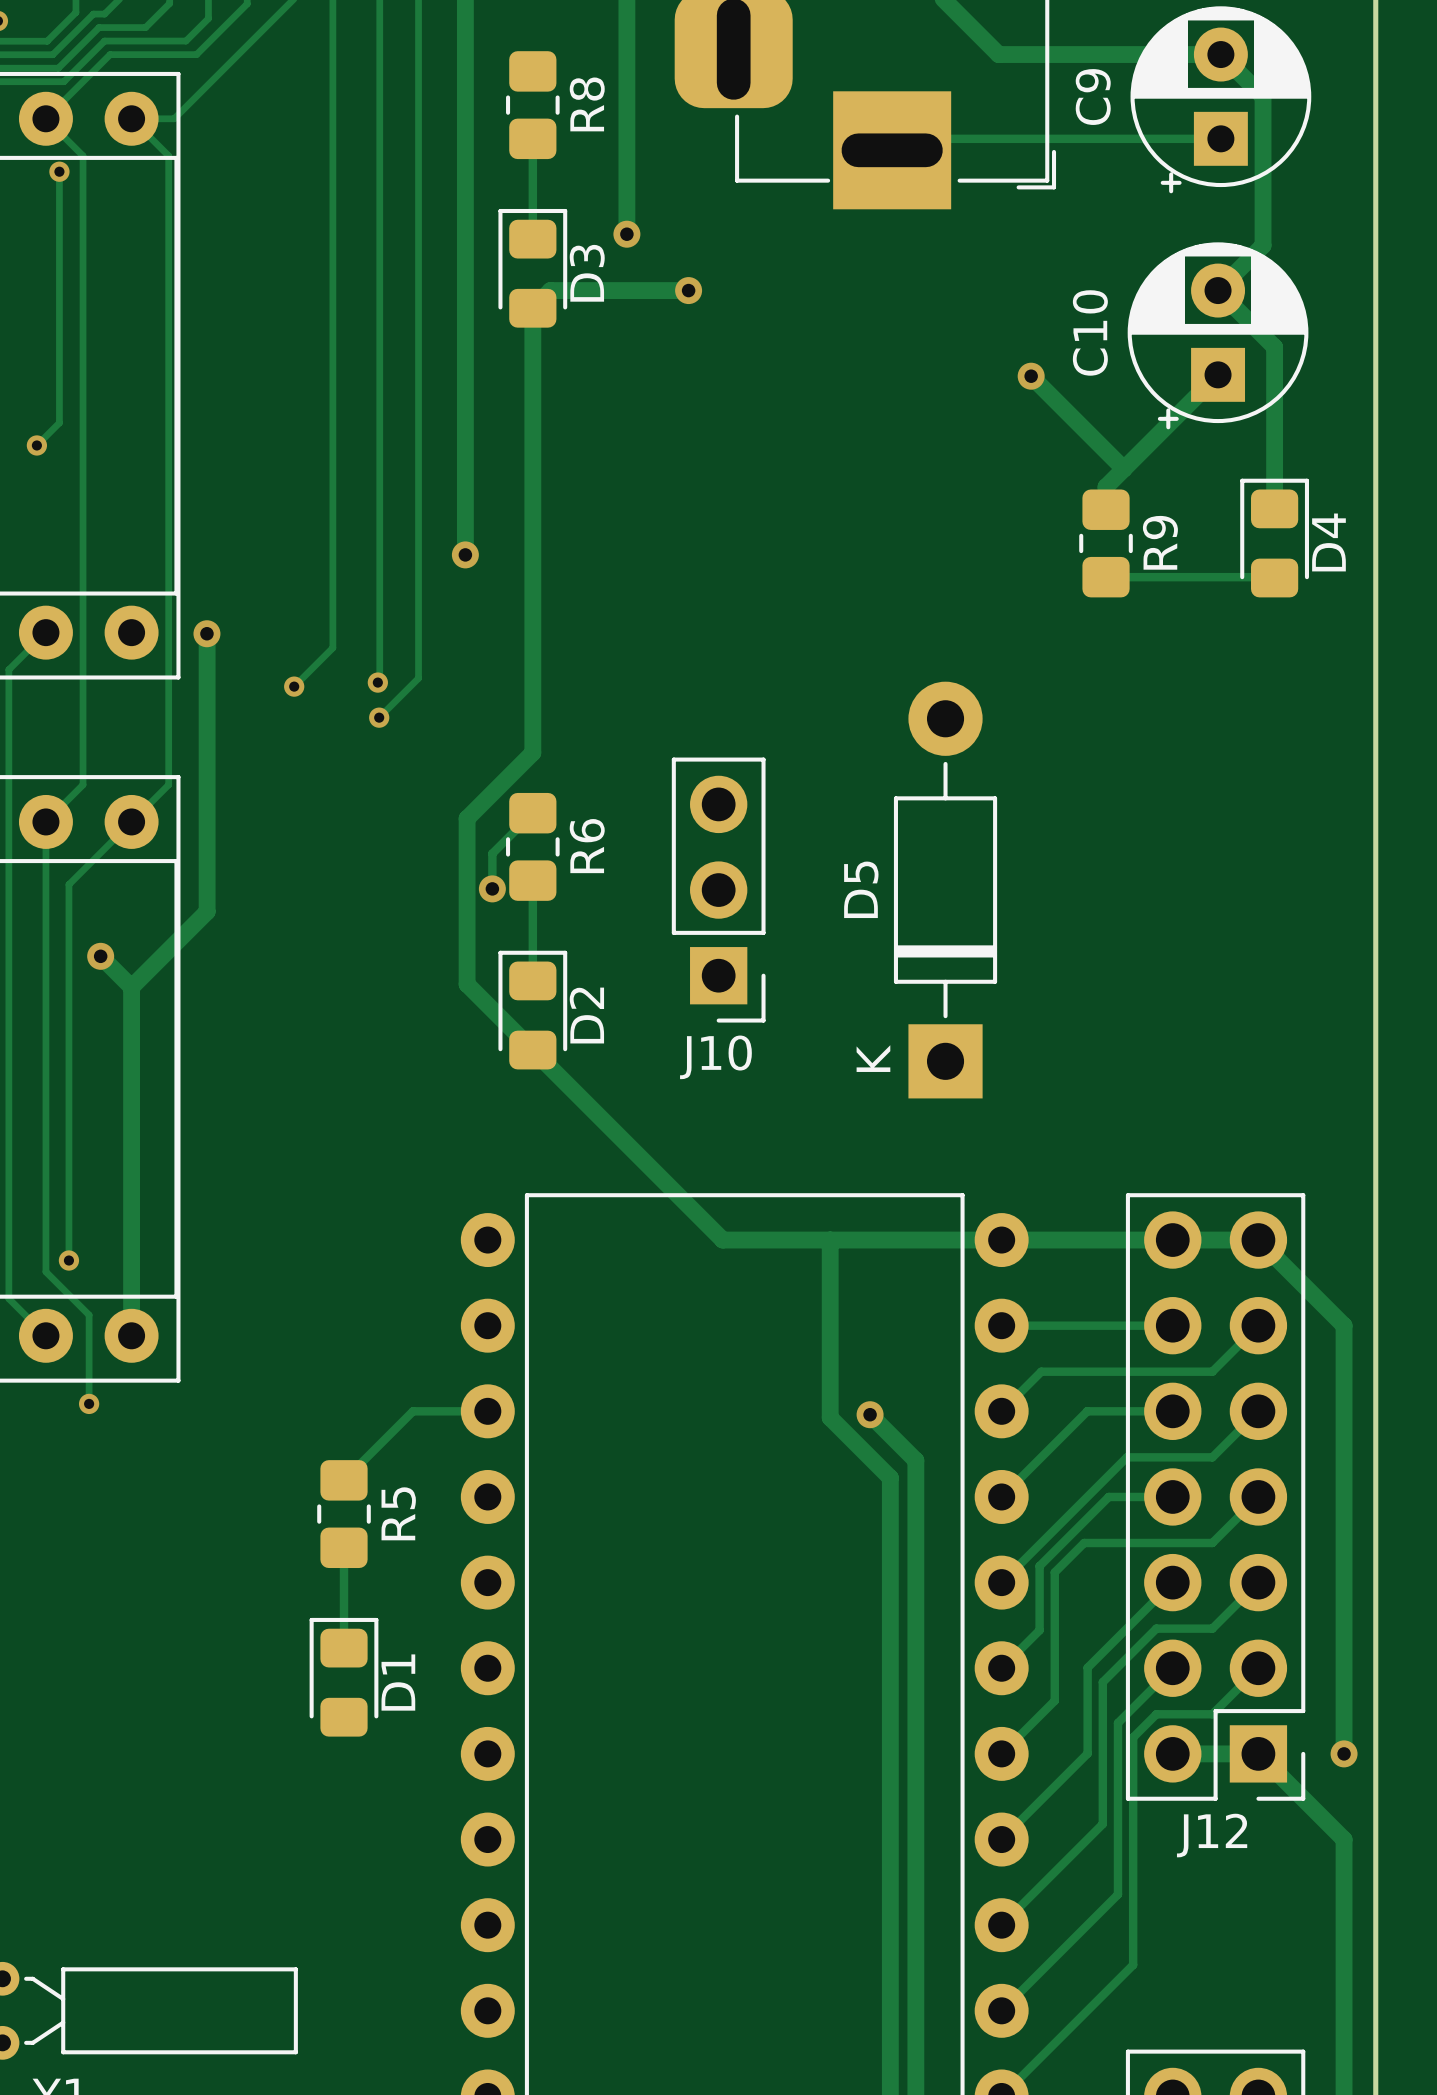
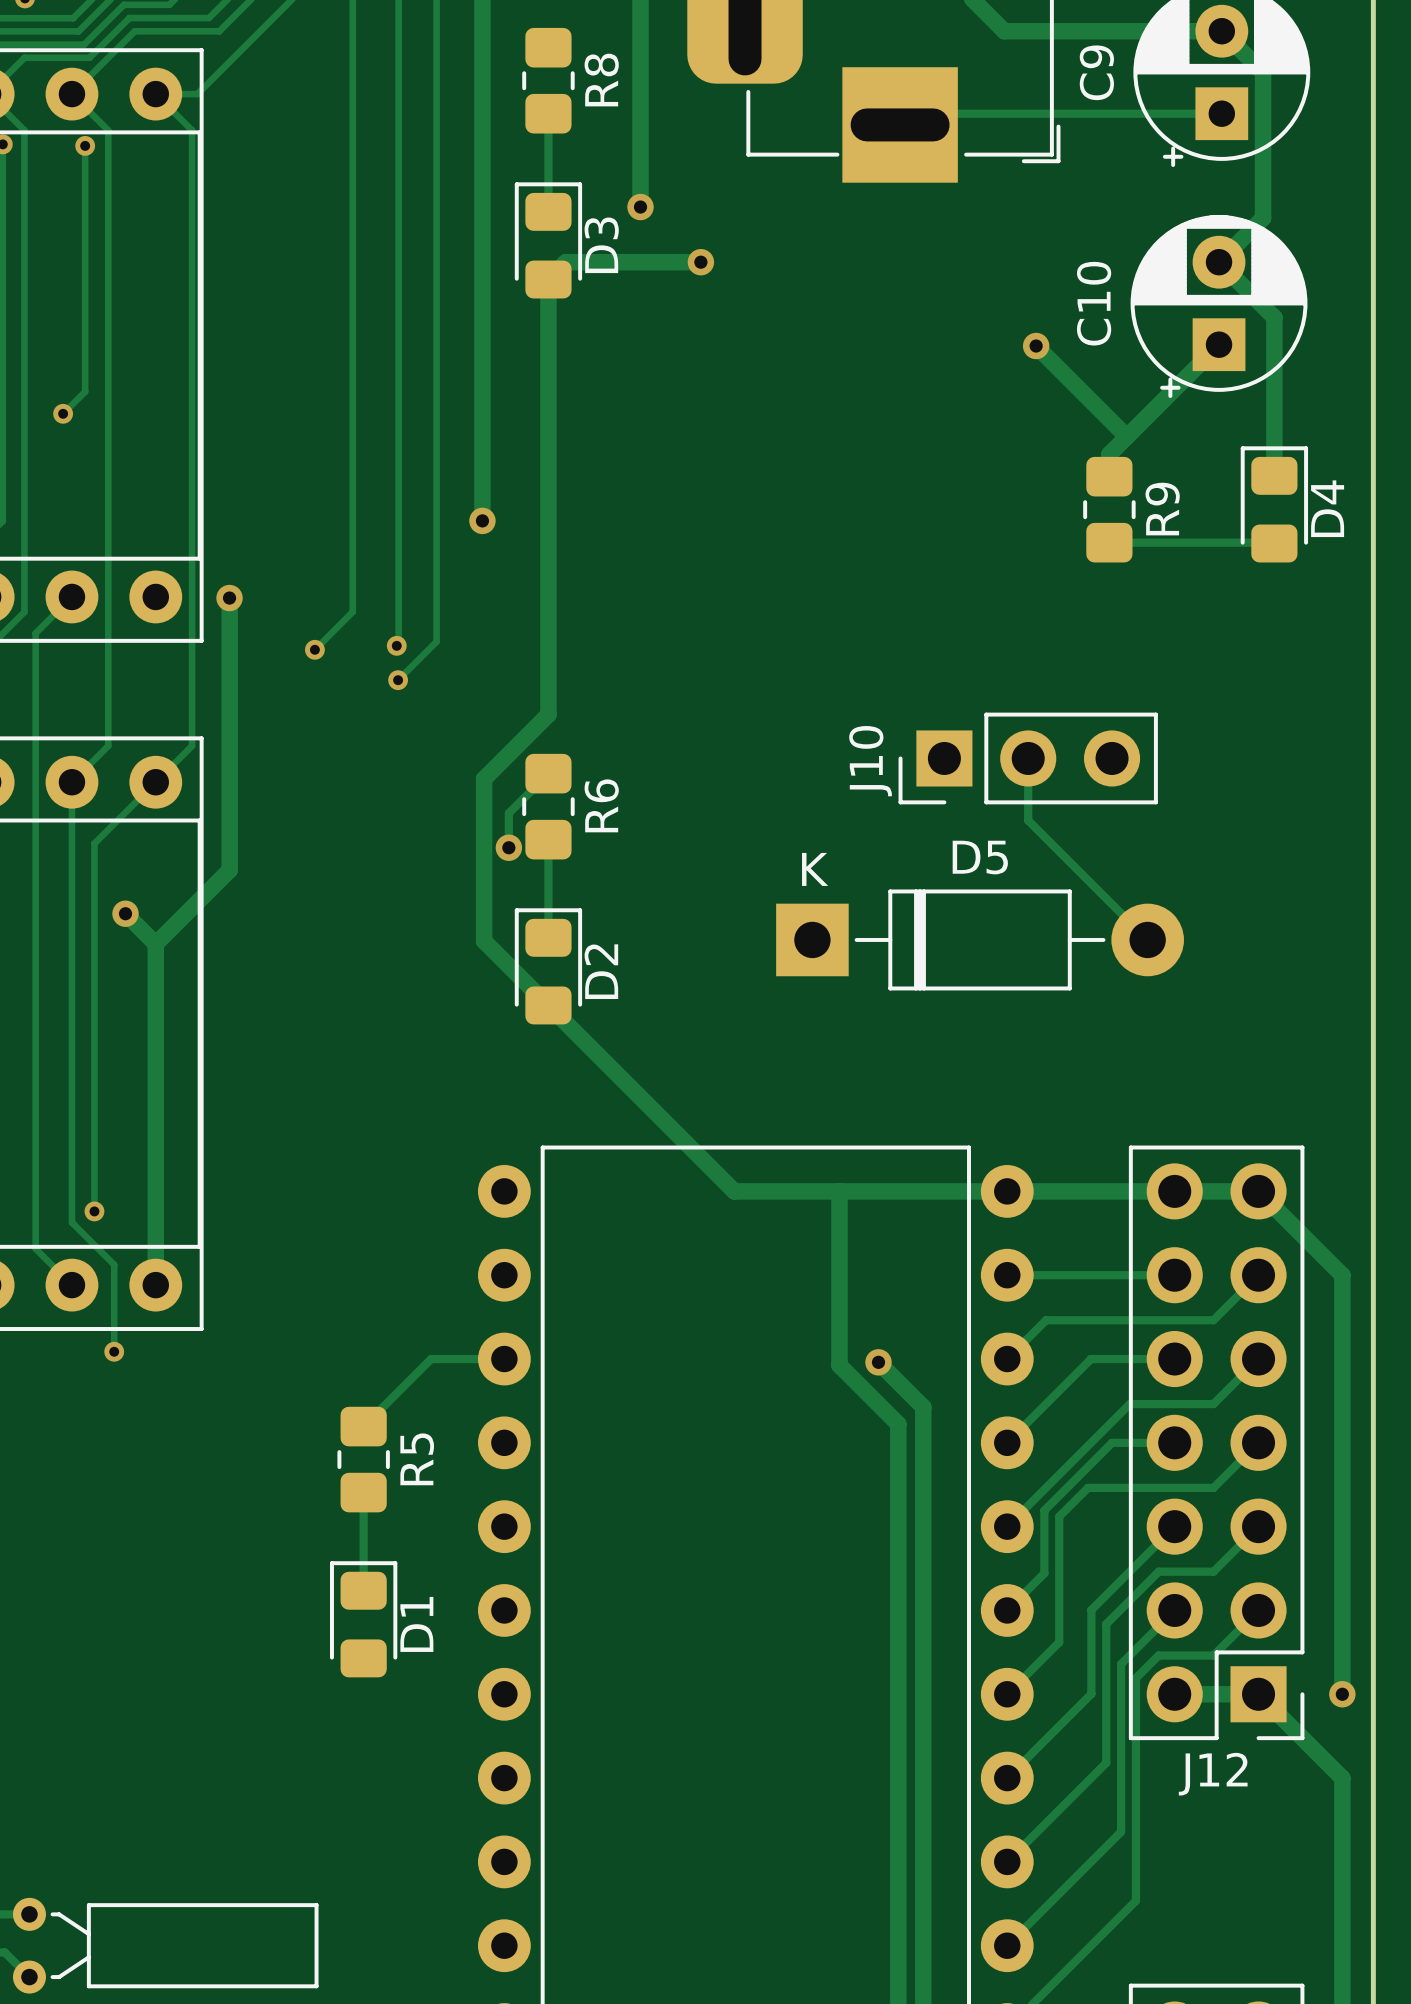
track: none -> (1028, 758) (1028, 820) (1147, 939)
J10 rotation: 0° (718, 890) -> 90° clockwise (1028, 758)
J10 position: (718, 890) -> (1028, 758)
D5 rotation: 0° (945, 890) -> 90° clockwise (980, 939)

